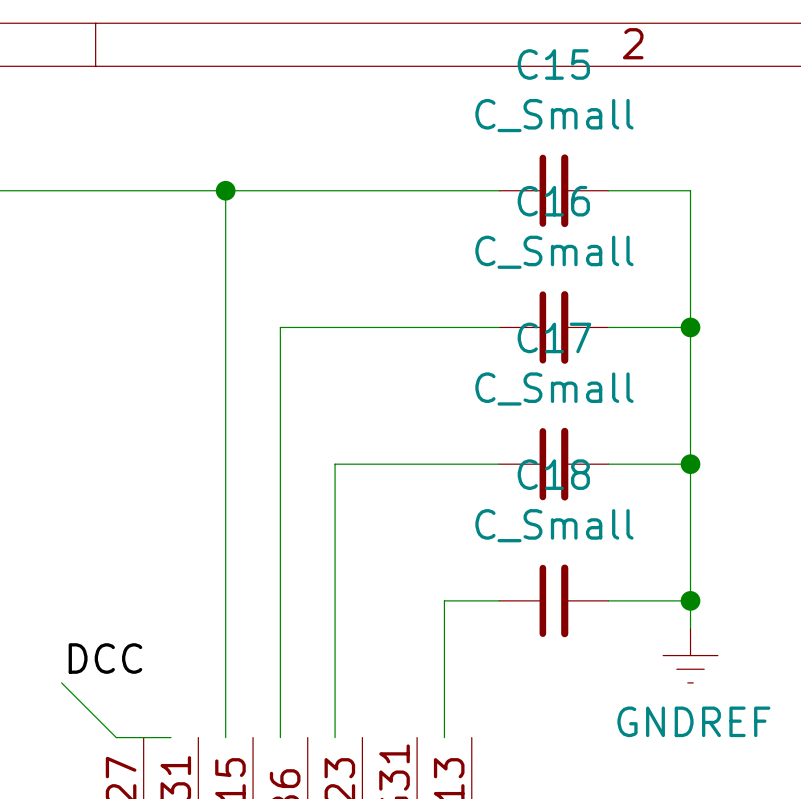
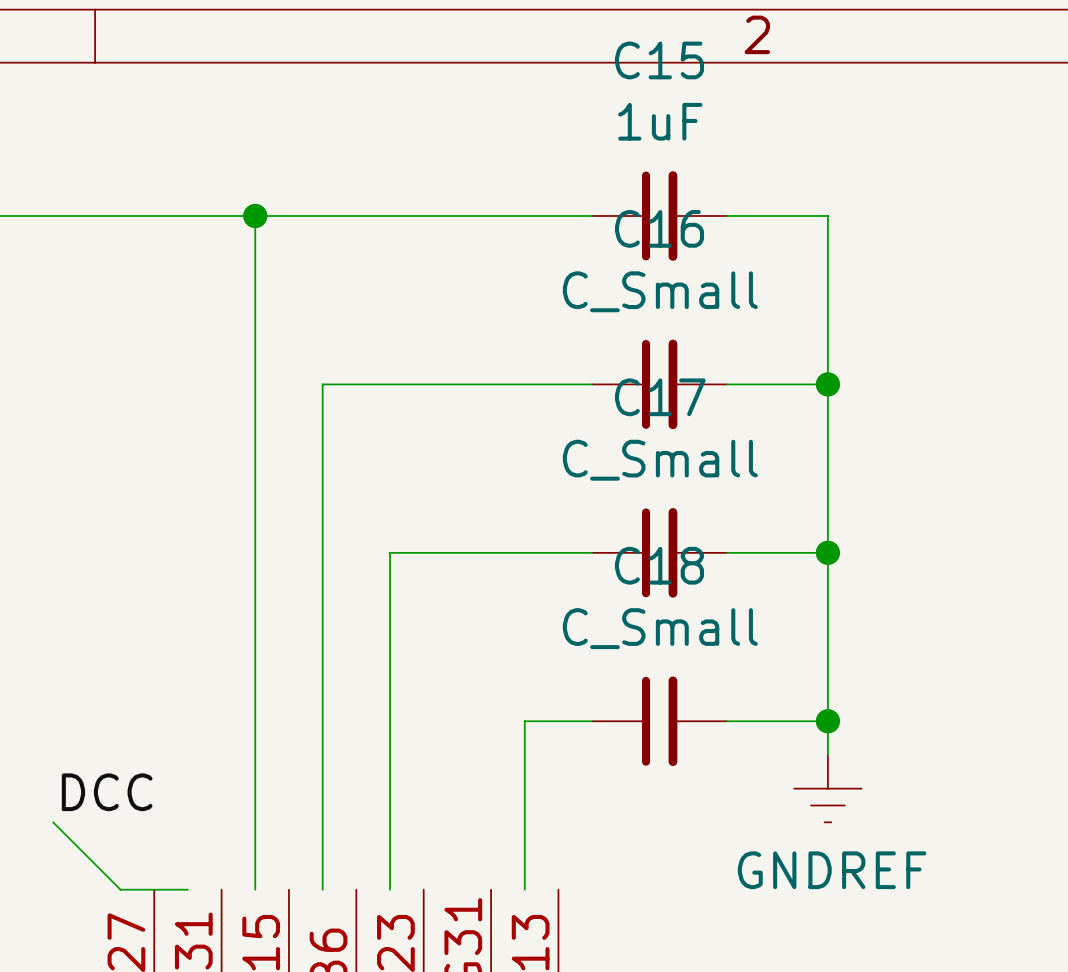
C15 value: C_Small (554, 115) -> 1uF (660, 121)

